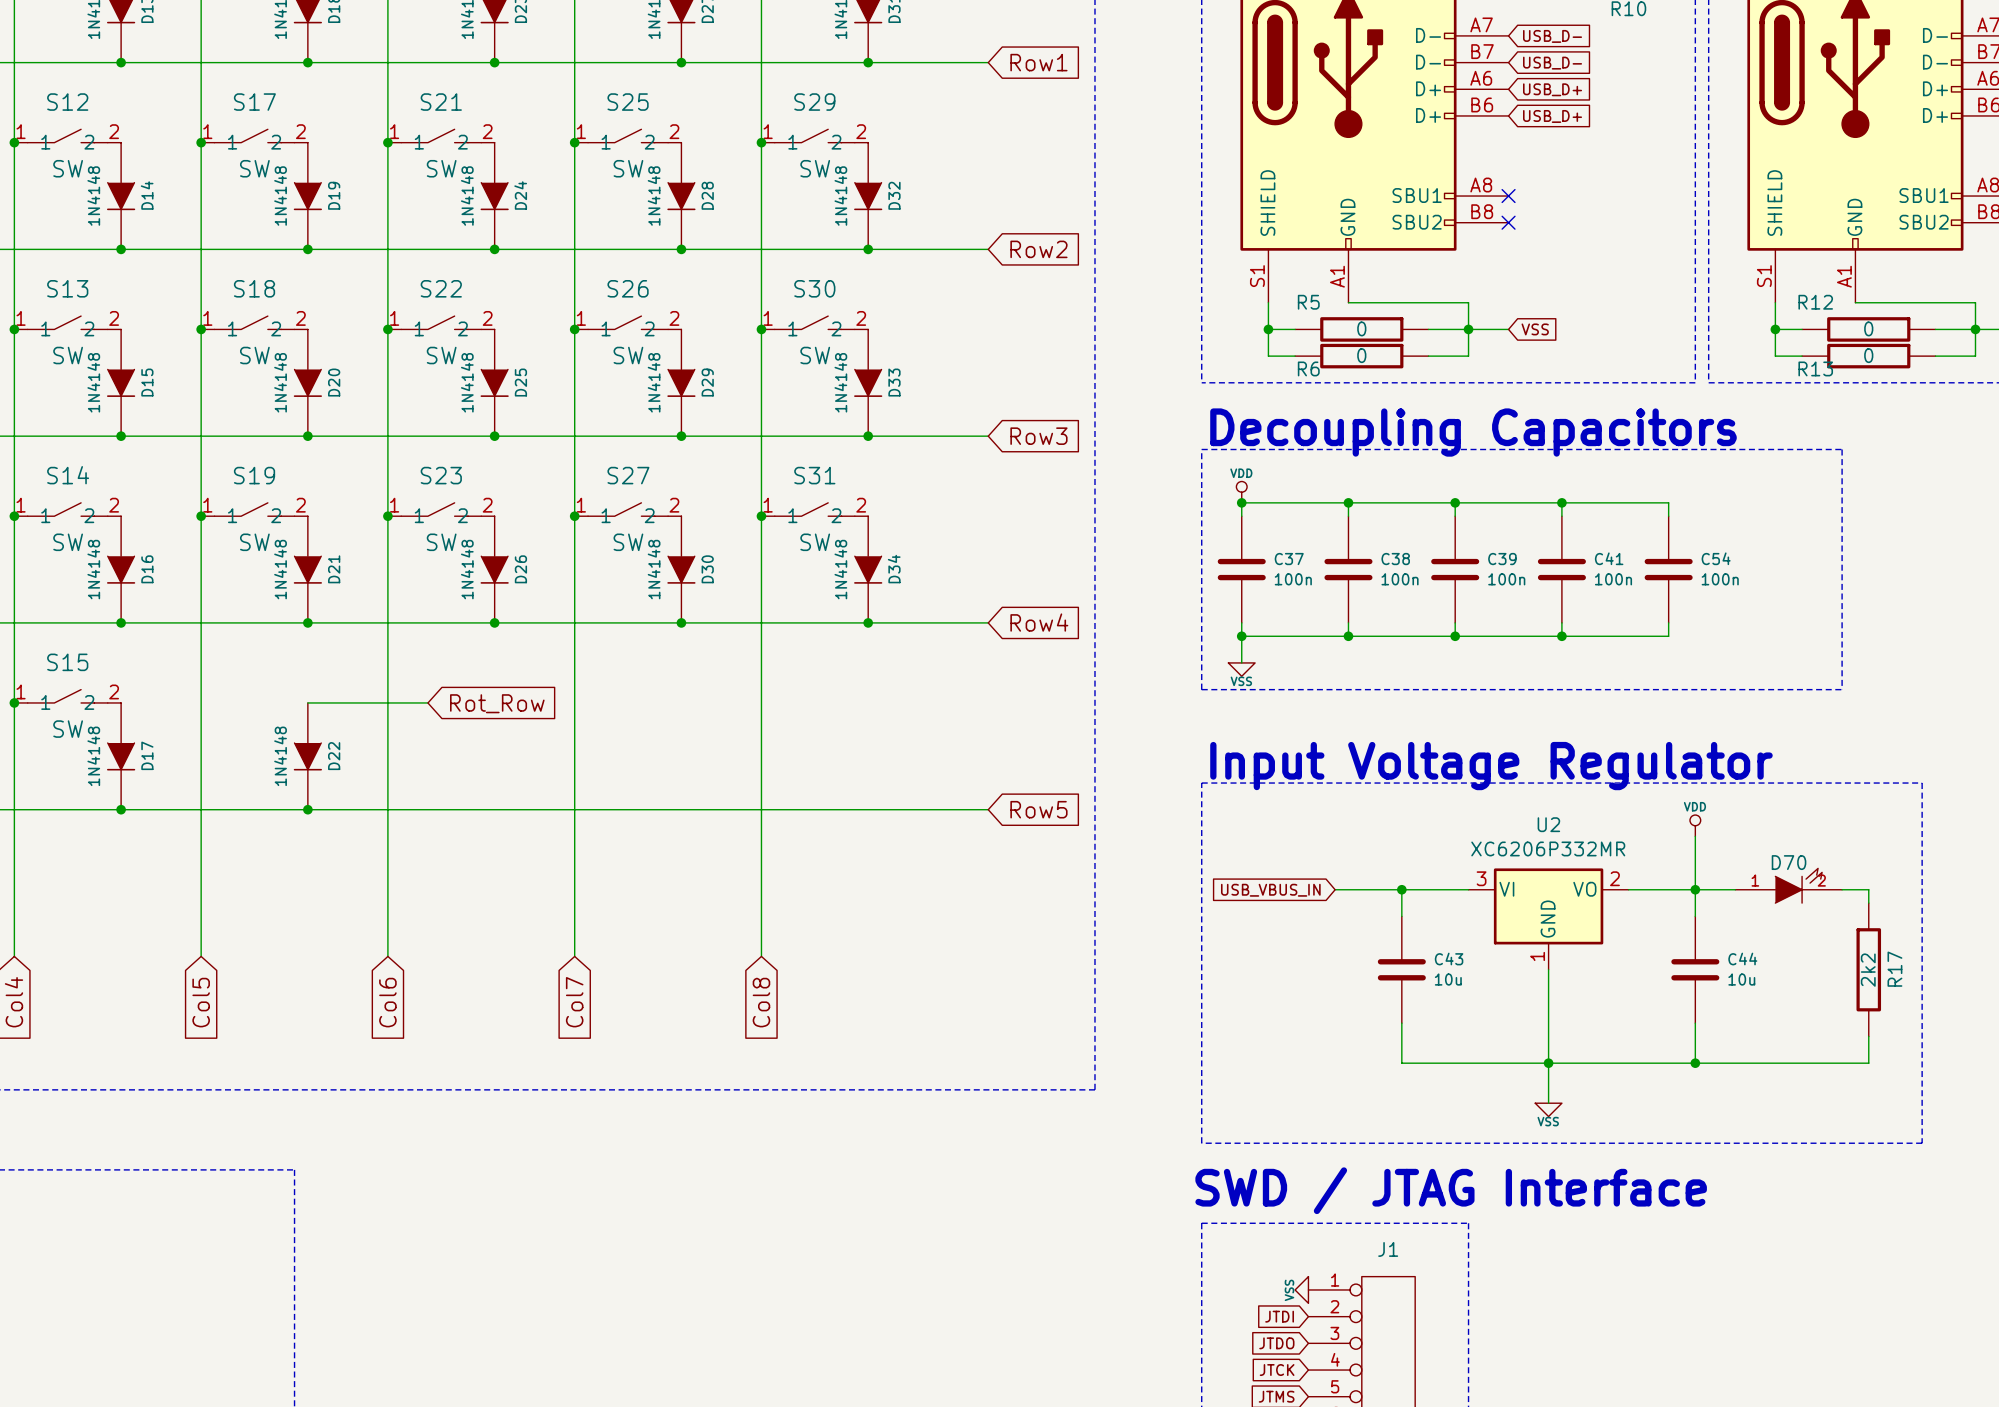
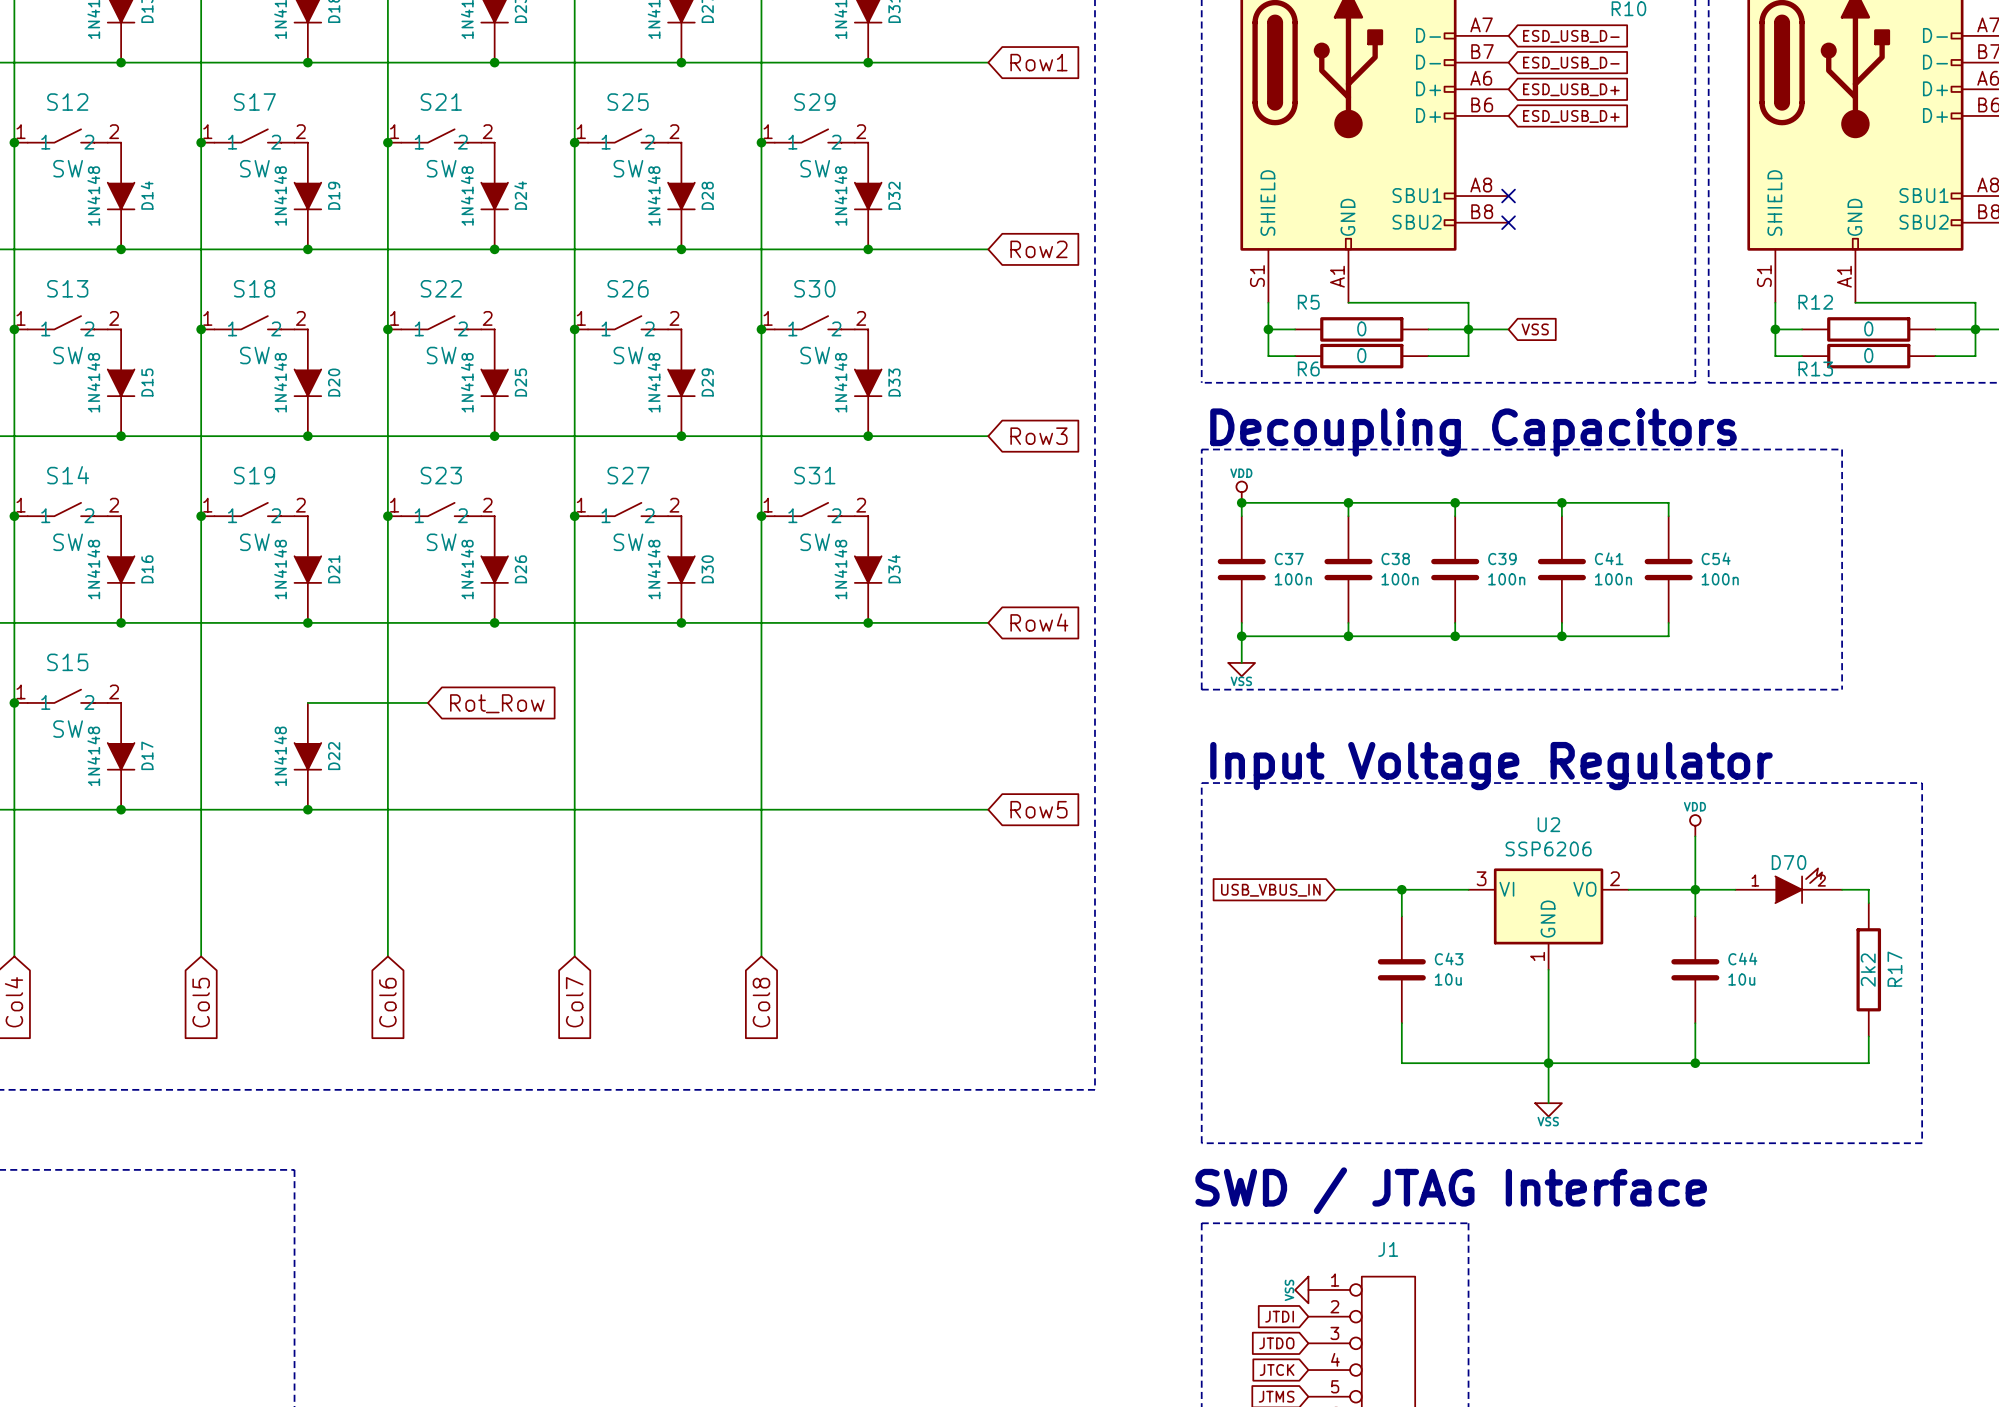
global label: USB_D- (1552, 36) -> ESD_USB_D- (1571, 36)
global label: USB_D- (1552, 63) -> ESD_USB_D- (1571, 63)
global label: USB_D+ (1552, 89) -> ESD_USB_D+ (1571, 89)
global label: USB_D+ (1552, 116) -> ESD_USB_D+ (1571, 116)
U2 value: XC6206P332MR (1548, 848) -> SSP6206 (1548, 848)

